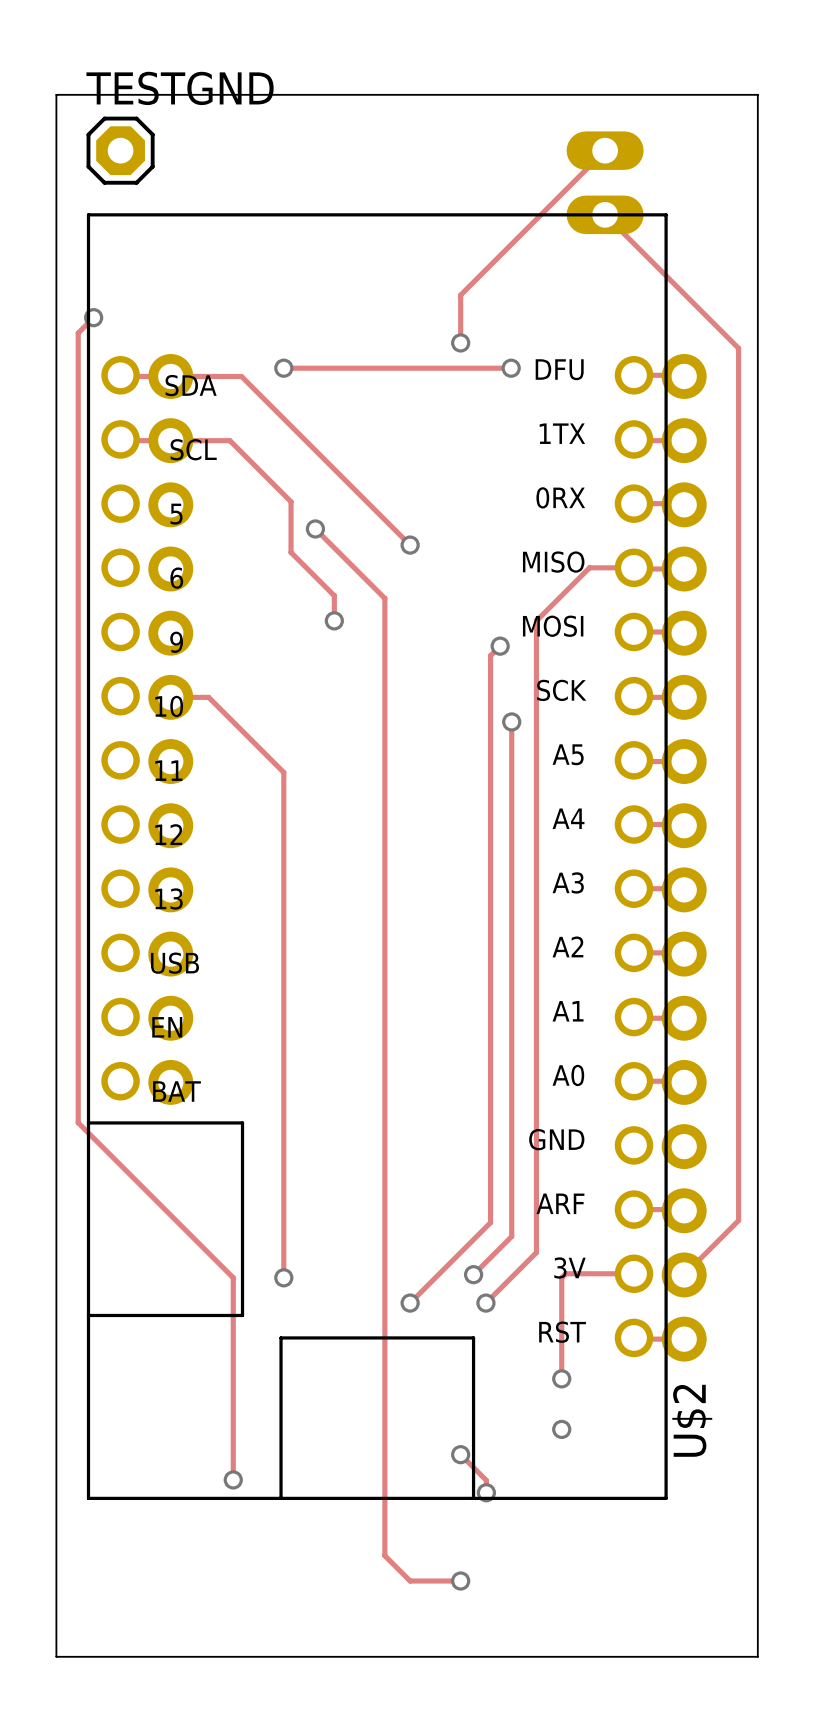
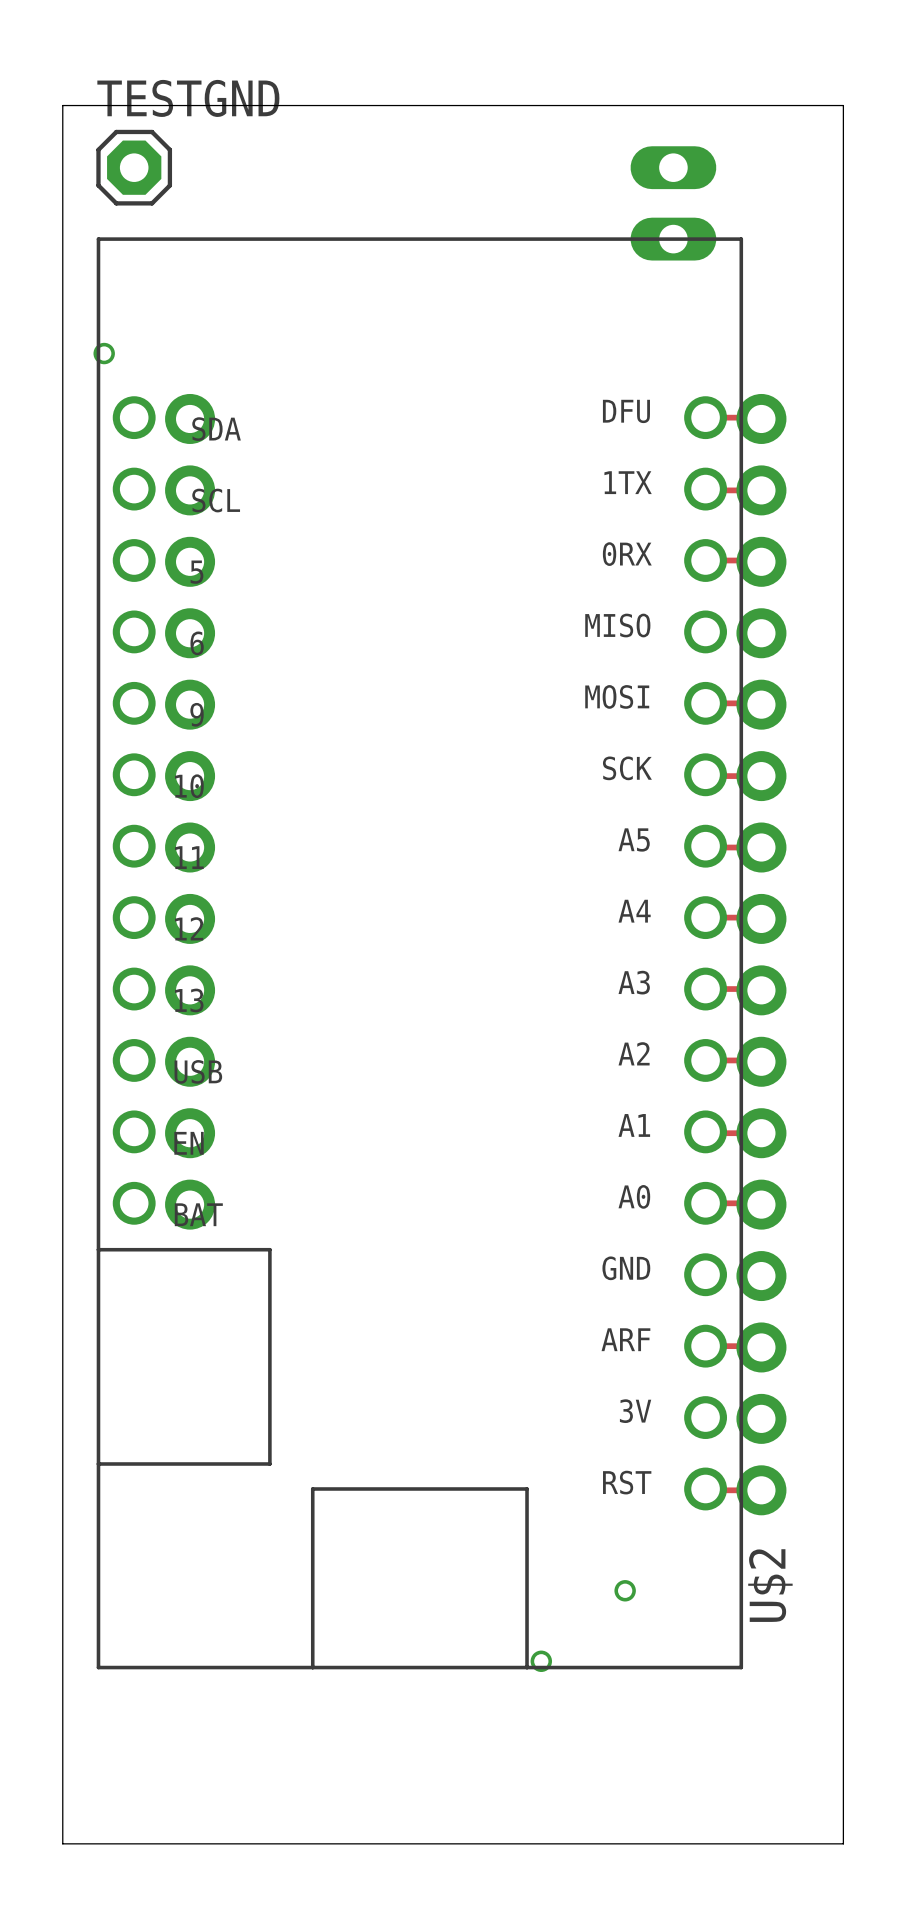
track: (605, 150) (460, 295) (460, 342) -> none
track: (605, 214) (738, 348) (738, 1220) (684, 1274) -> none
track: (93, 317) (78, 333) (78, 1122) (233, 1277) (233, 1479) -> none
via: (460, 342) -> none
track: (283, 368) (511, 368) -> none
via: (283, 368) -> none
via: (511, 368) -> none
track: (120, 375) (241, 376) (410, 545) -> none
track: (120, 439) (229, 440) (291, 501) (291, 552) (334, 595) (334, 620) -> none
track: (315, 528) (384, 598) (384, 1555) (410, 1581) (460, 1581) -> none
via: (315, 528) -> none
via: (410, 545) -> none
track: (684, 569) (589, 567) (536, 620) (536, 1252) (485, 1303) -> none
via: (334, 620) -> none
track: (500, 646) (490, 655) (490, 1222) (410, 1303) -> none
via: (500, 646) -> none
track: (170, 697) (208, 697) (283, 772) (283, 1277) -> none
track: (511, 721) (511, 1236) (473, 1274) -> none
via: (511, 721) -> none
track: (634, 1273) (565, 1273) (561, 1277) (561, 1378) -> none
via: (473, 1274) -> none
via: (283, 1277) -> none
via: (410, 1303) -> none
via: (485, 1303) -> none
via: (561, 1378) -> none
track: (460, 1454) (486, 1480) (486, 1492) -> none
via: (460, 1454) -> none
via: (233, 1479) -> none
via: (460, 1581) -> none

